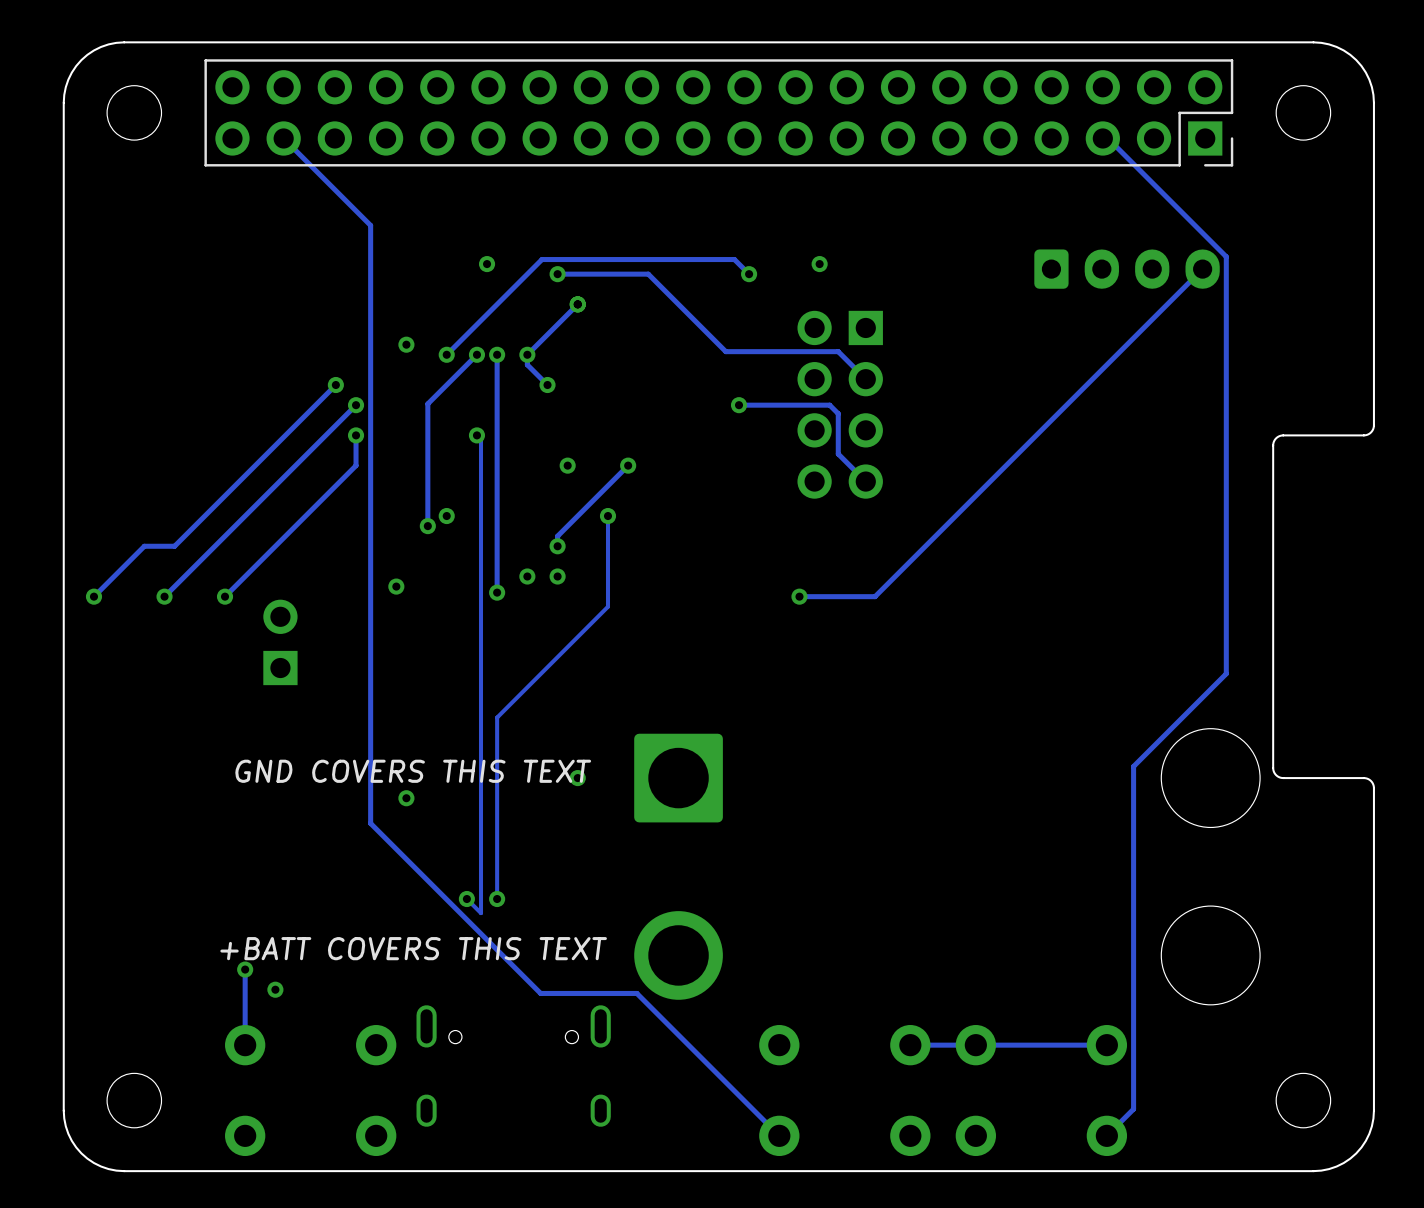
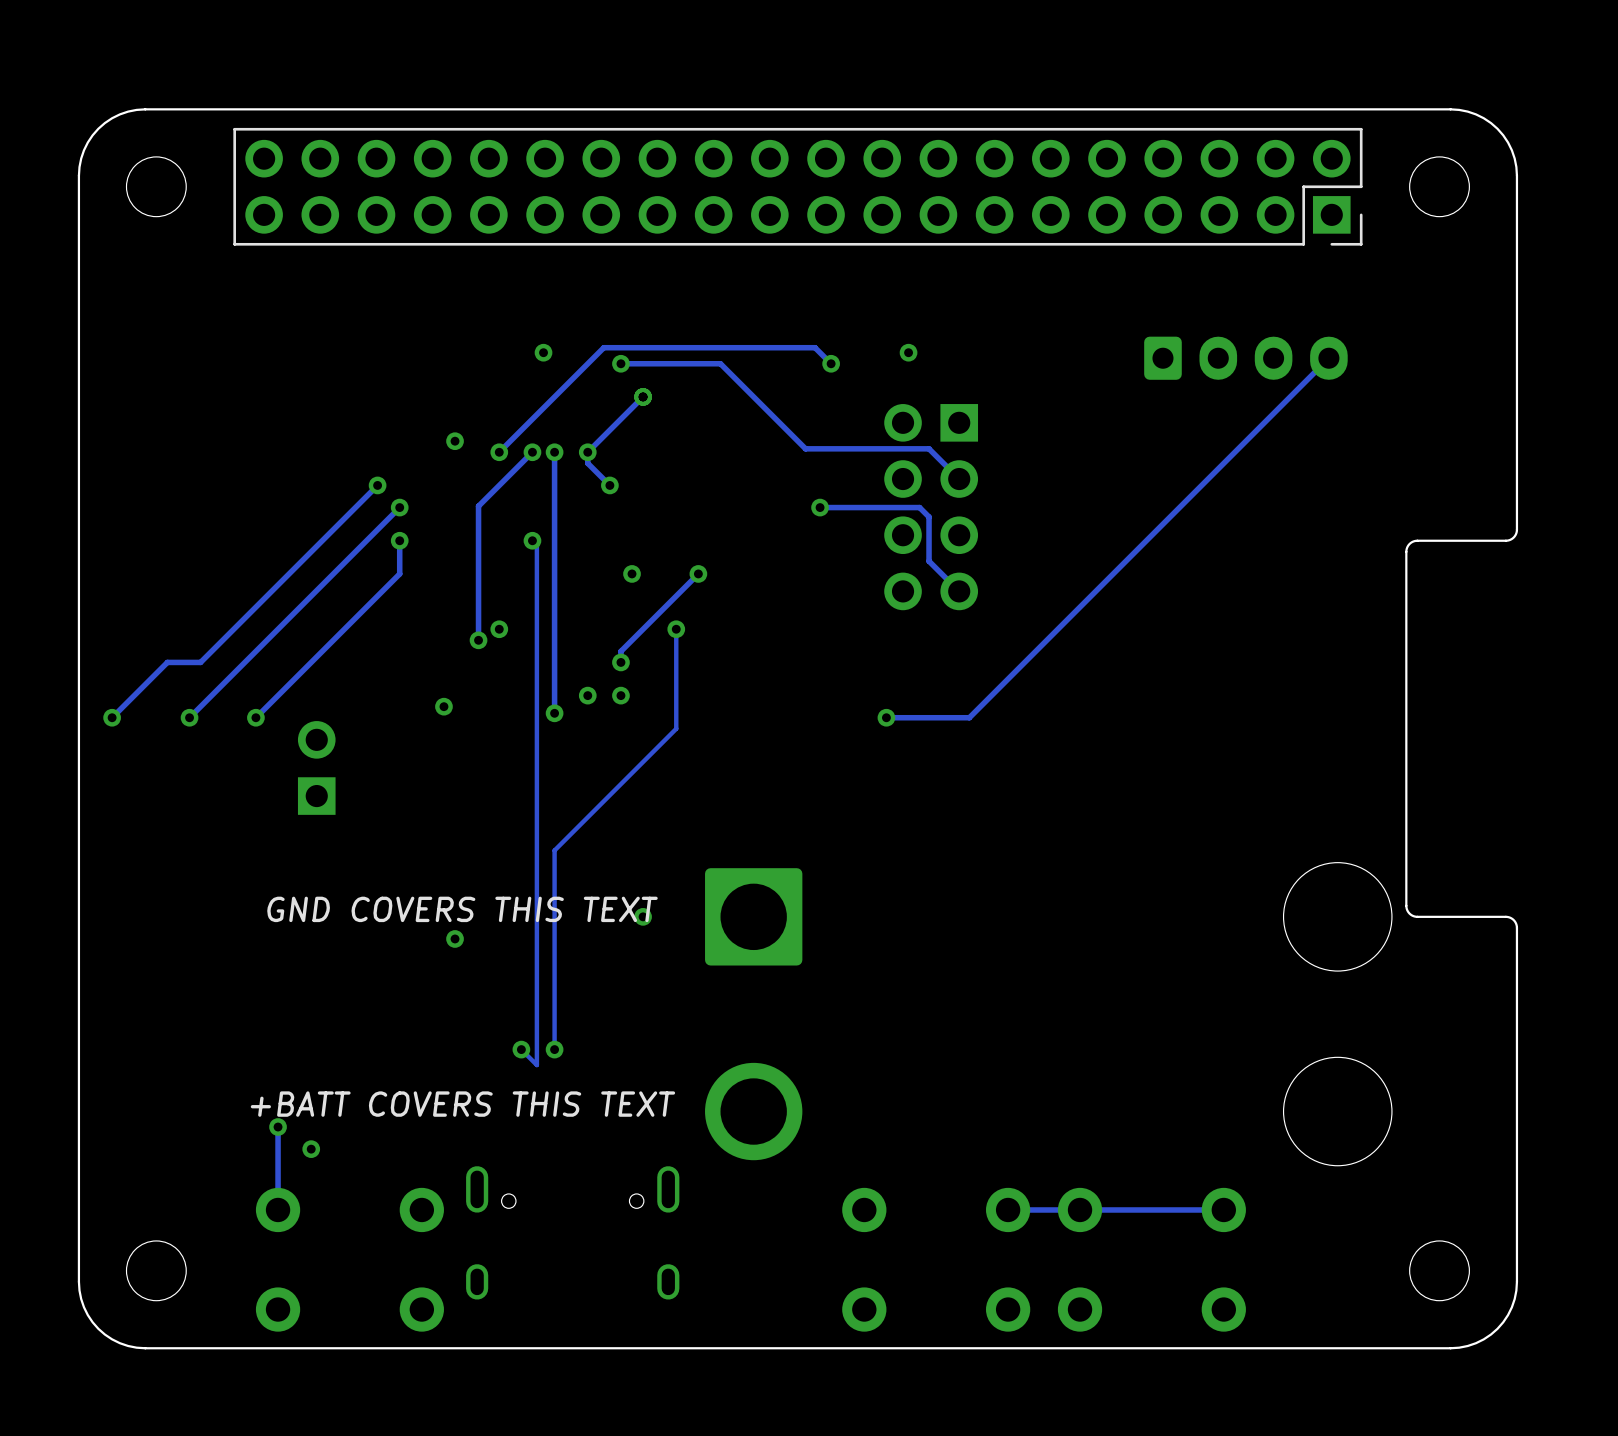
track: (283, 138) (370, 225) (370, 823) (540, 993) (636, 993) (779, 1135) -> none
track: (1102, 138) (1108, 138) (1226, 256) (1226, 673) (1133, 766) (1133, 1109) (1106, 1135) -> none

